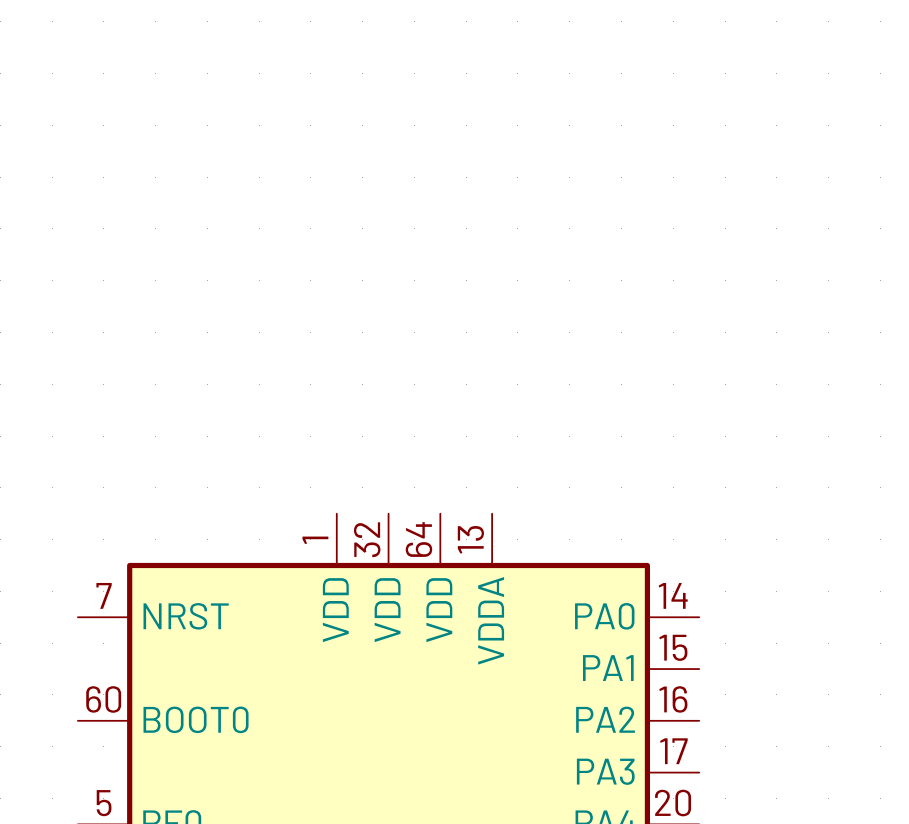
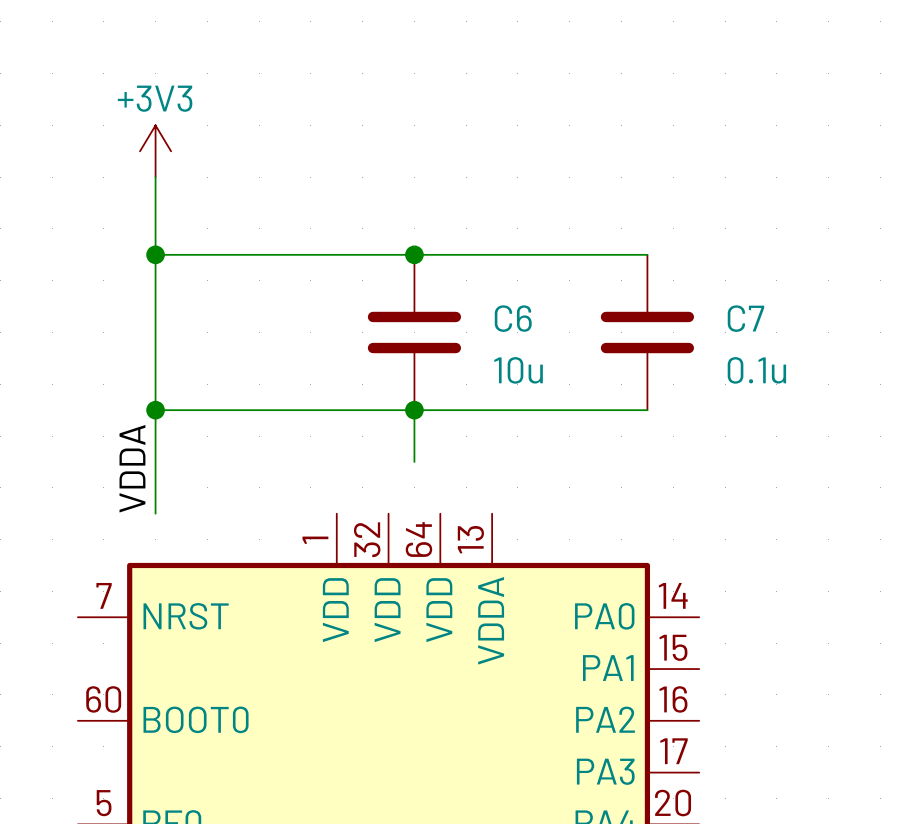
power symbol: none -> +3V3 (155, 151)
wire: none -> (155, 177) (155, 513)
wire: none -> (155, 254) (647, 254)
junction: none -> (155, 254)
junction: none -> (414, 254)
C6: none -> 10u (414, 332)
C7: none -> 0.1u (647, 332)
wire: none -> (155, 410) (647, 410)
junction: none -> (155, 410)
wire: none -> (414, 410) (414, 461)
junction: none -> (414, 410)
label: none -> VDDA (132, 468)

